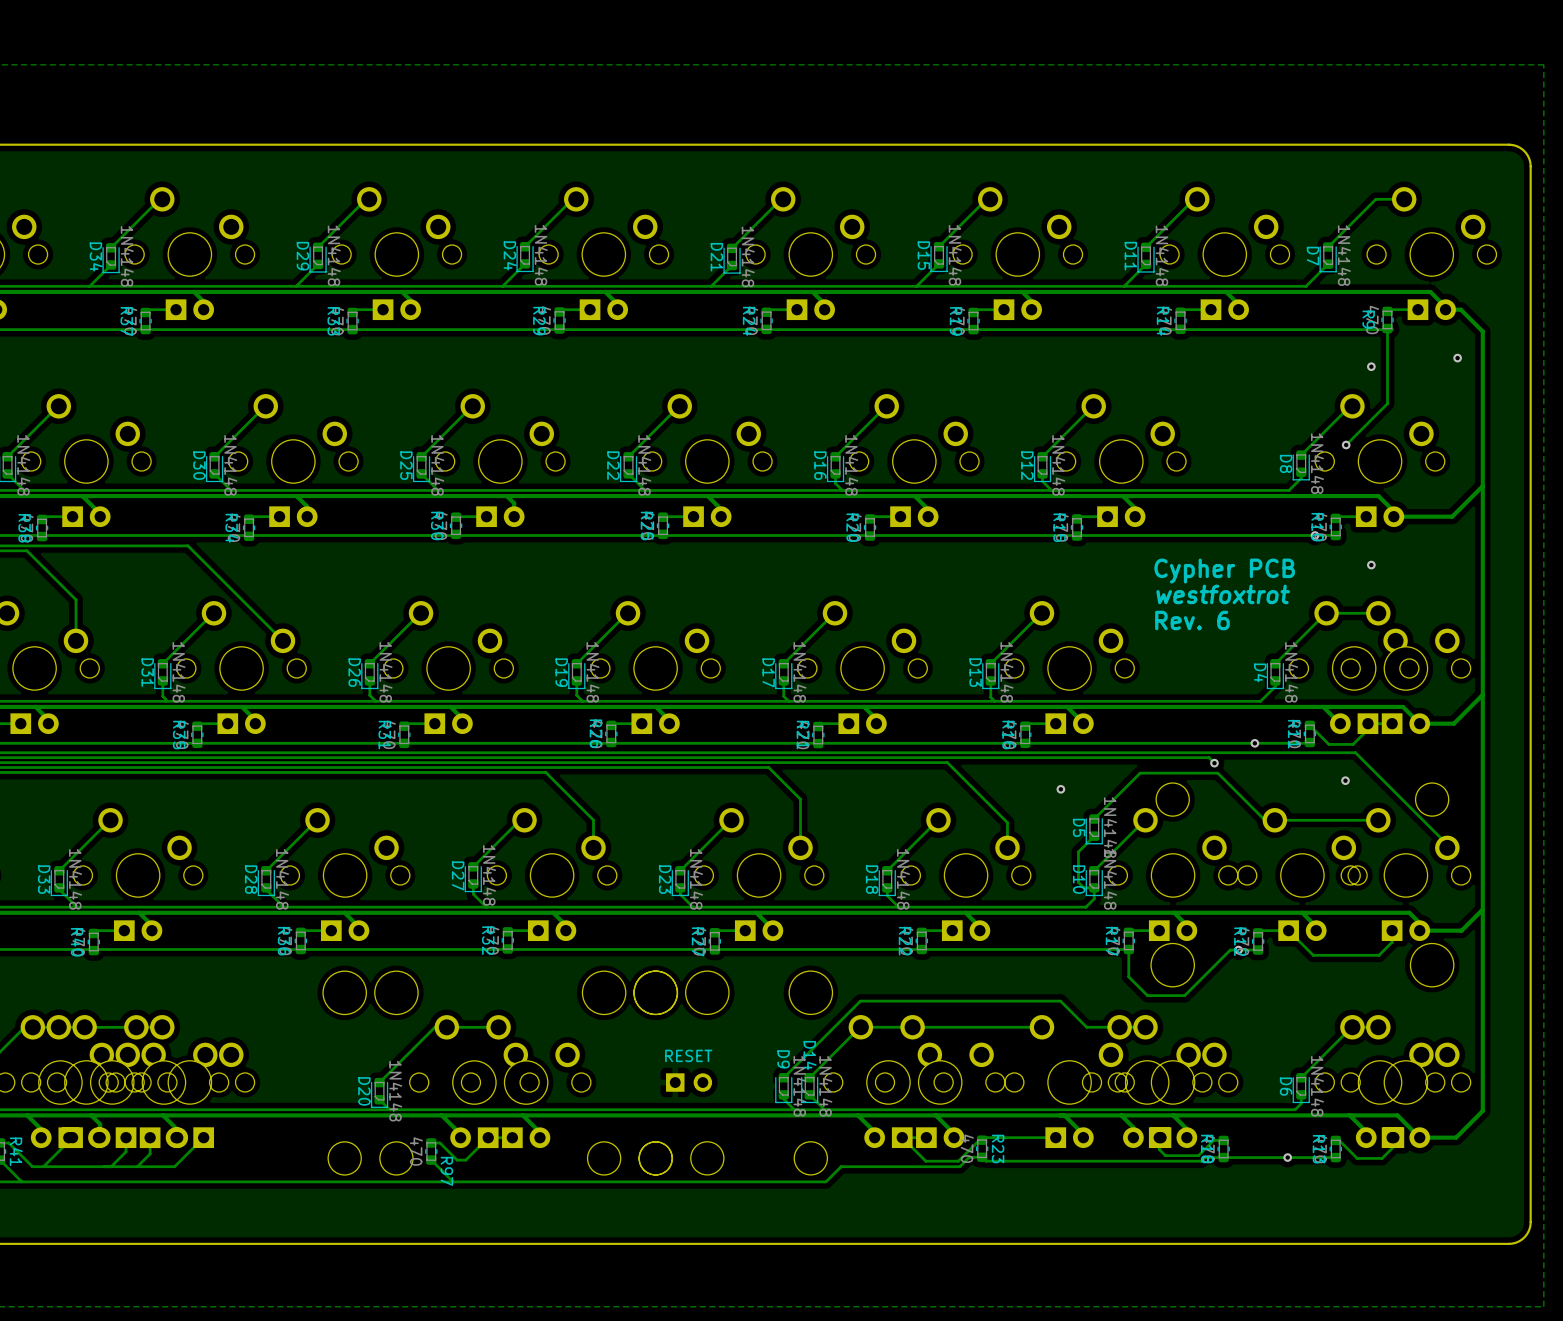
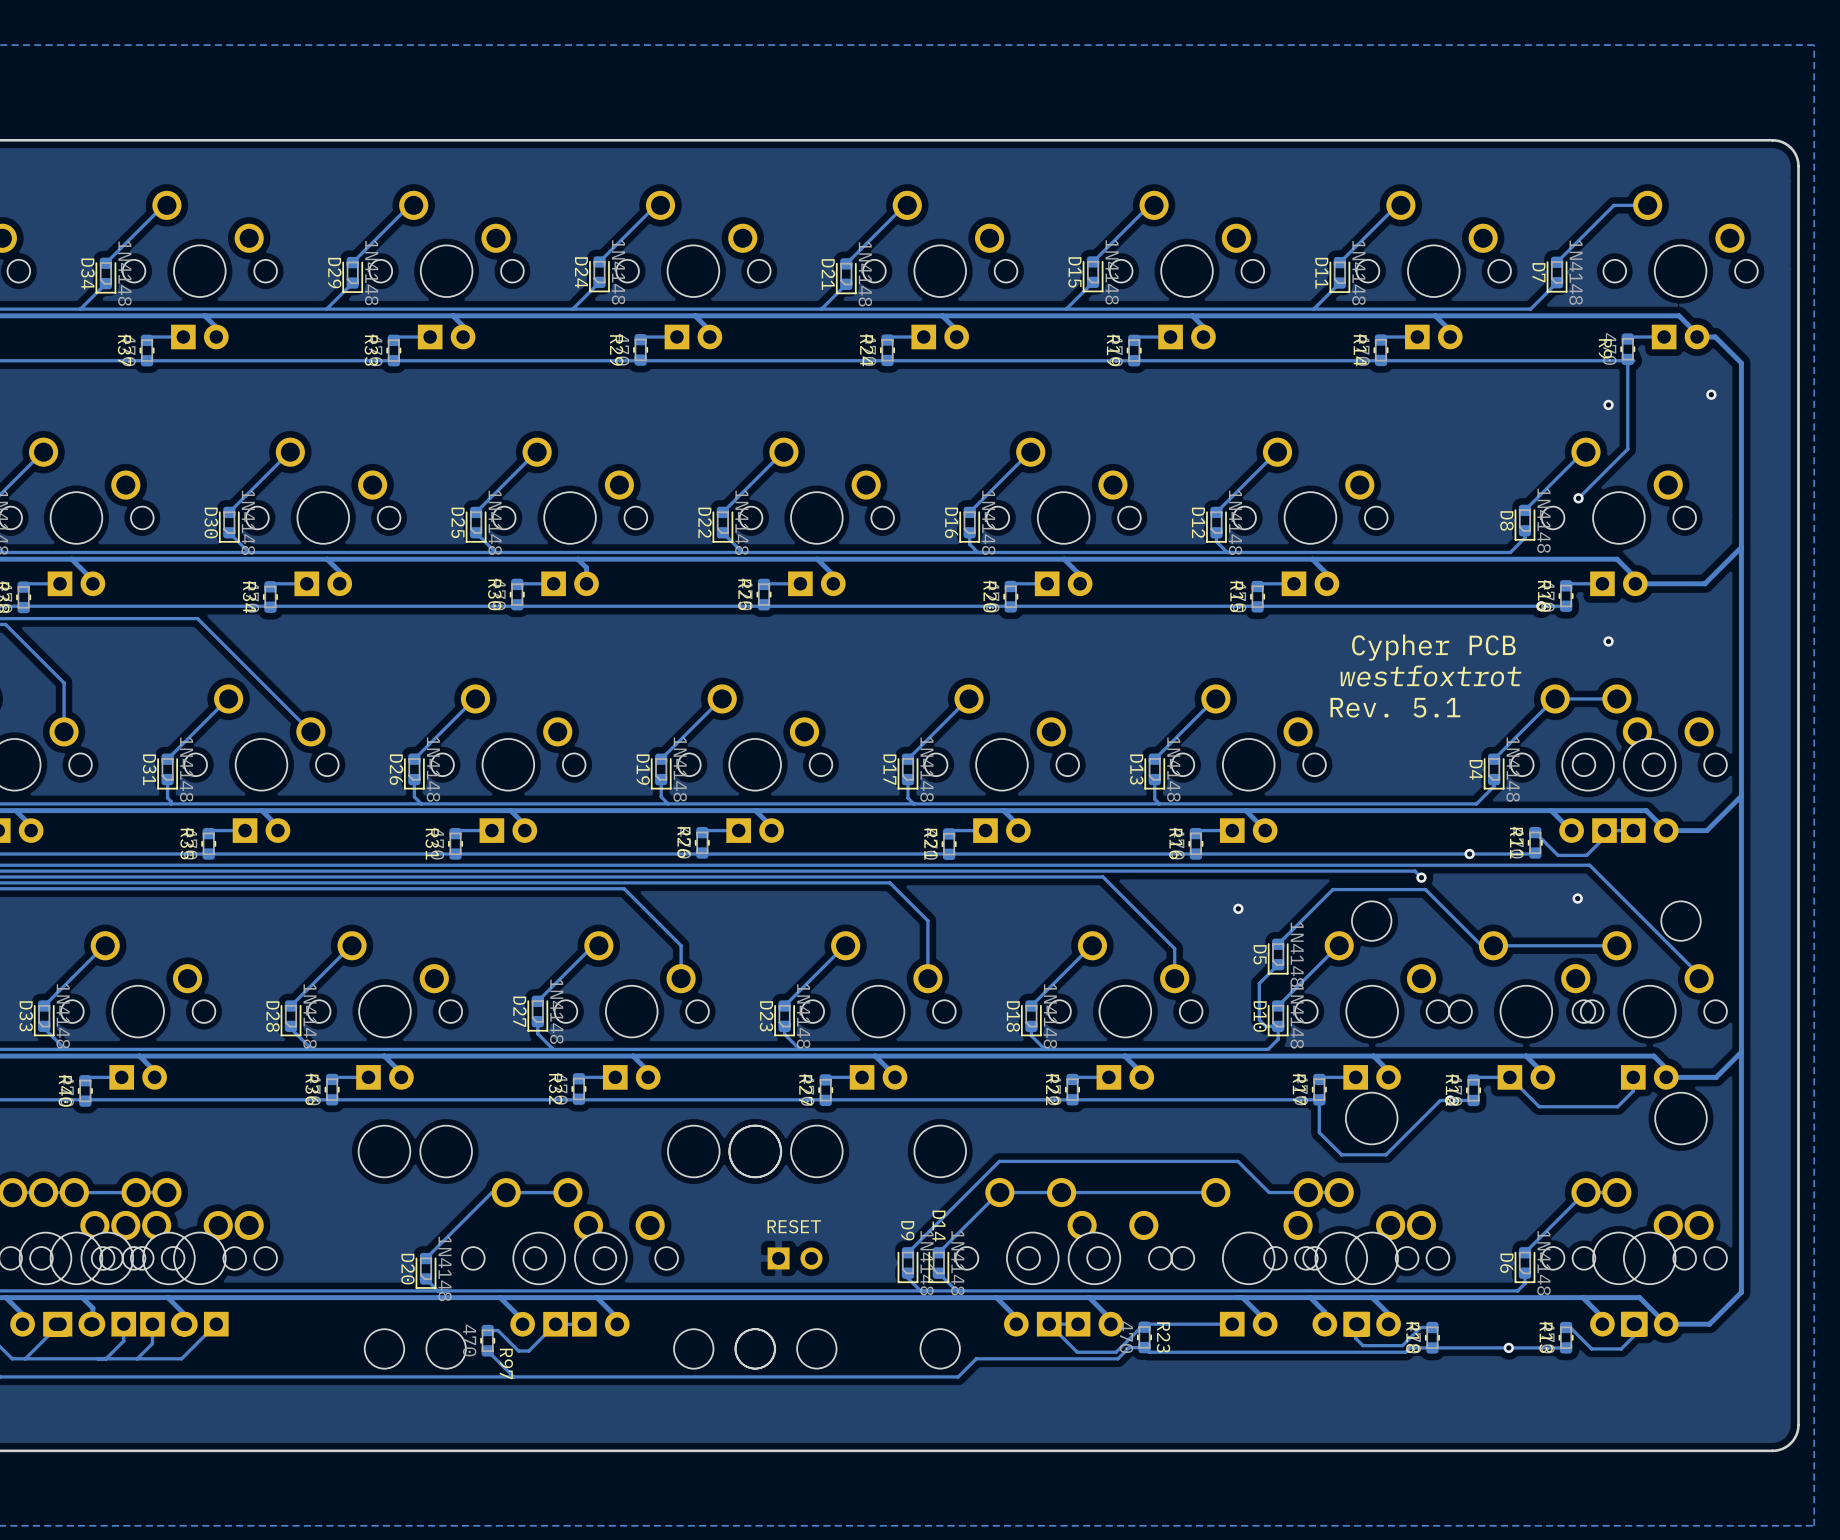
text: Rev. 6 (1192, 620) -> Rev. 5.1 (1395, 707)

